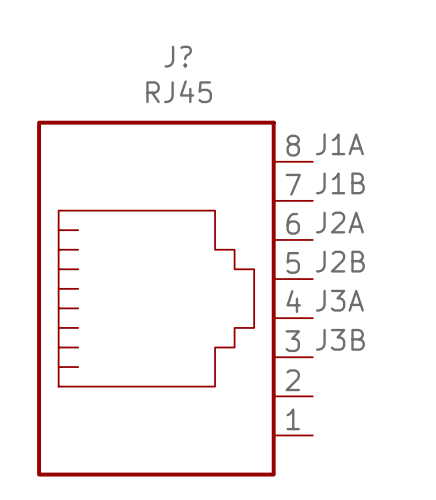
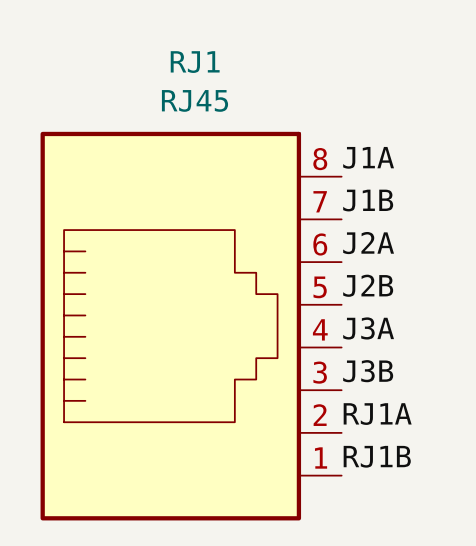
J? name: J? (178, 56) -> RJ1 (195, 62)
label: none -> RJ1A (377, 414)
label: none -> RJ1B (377, 456)

